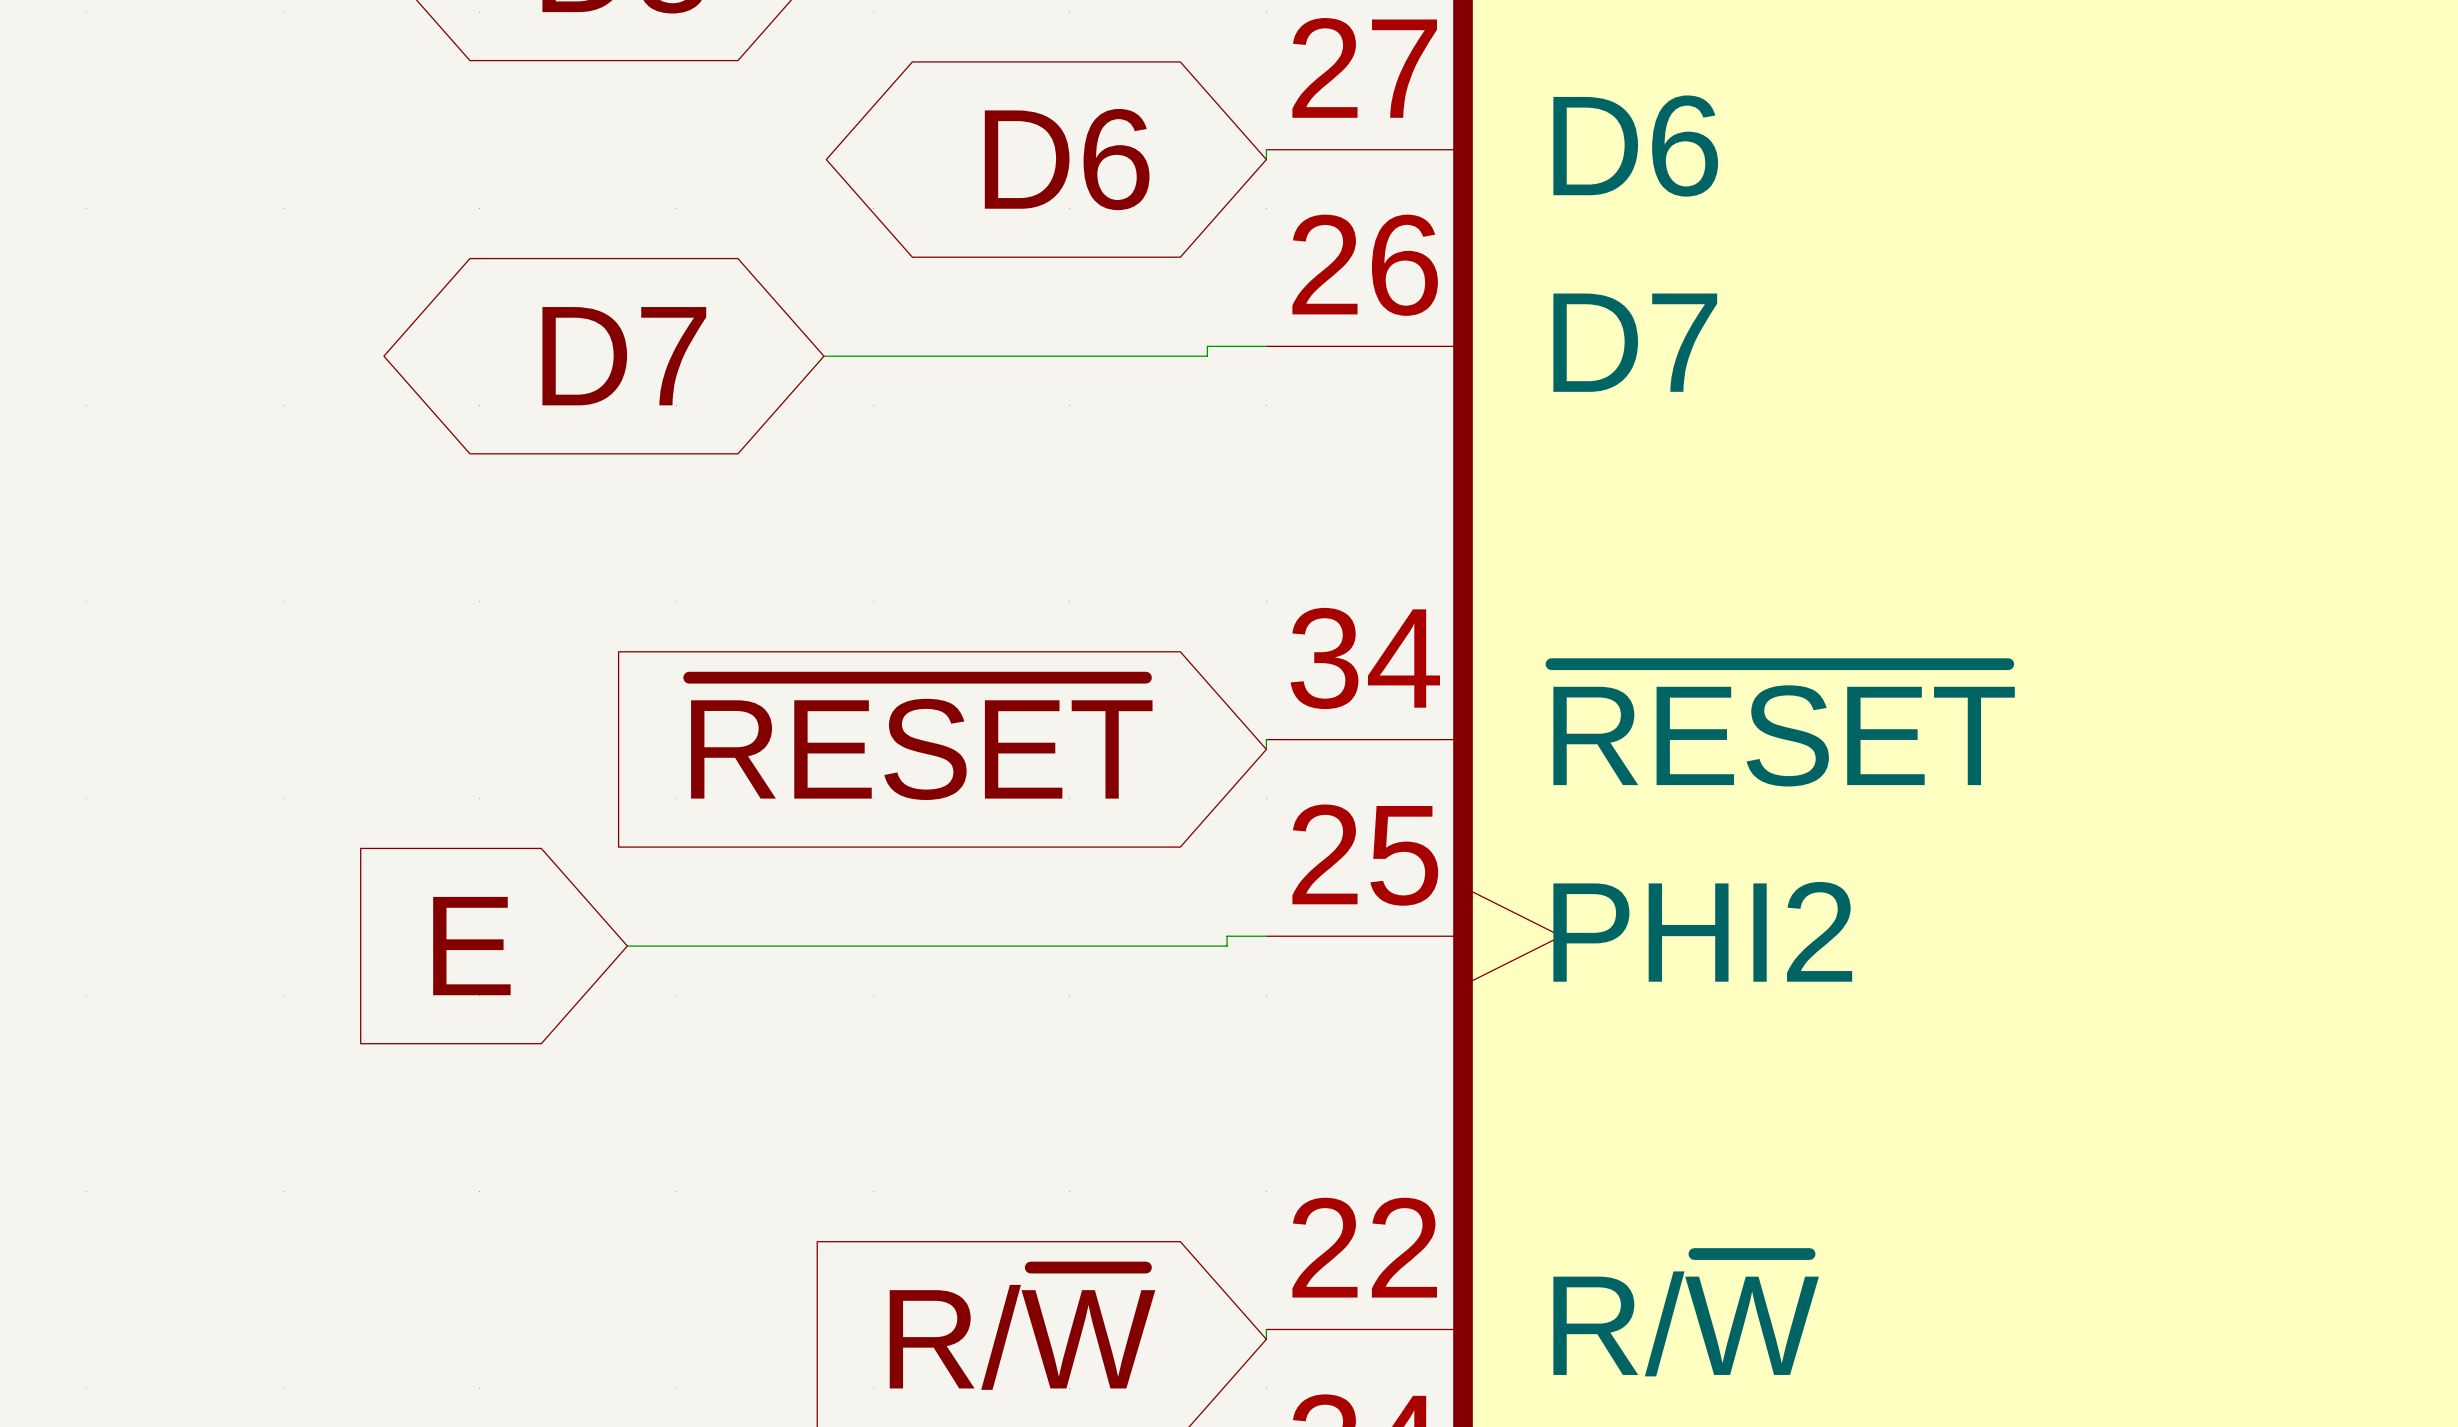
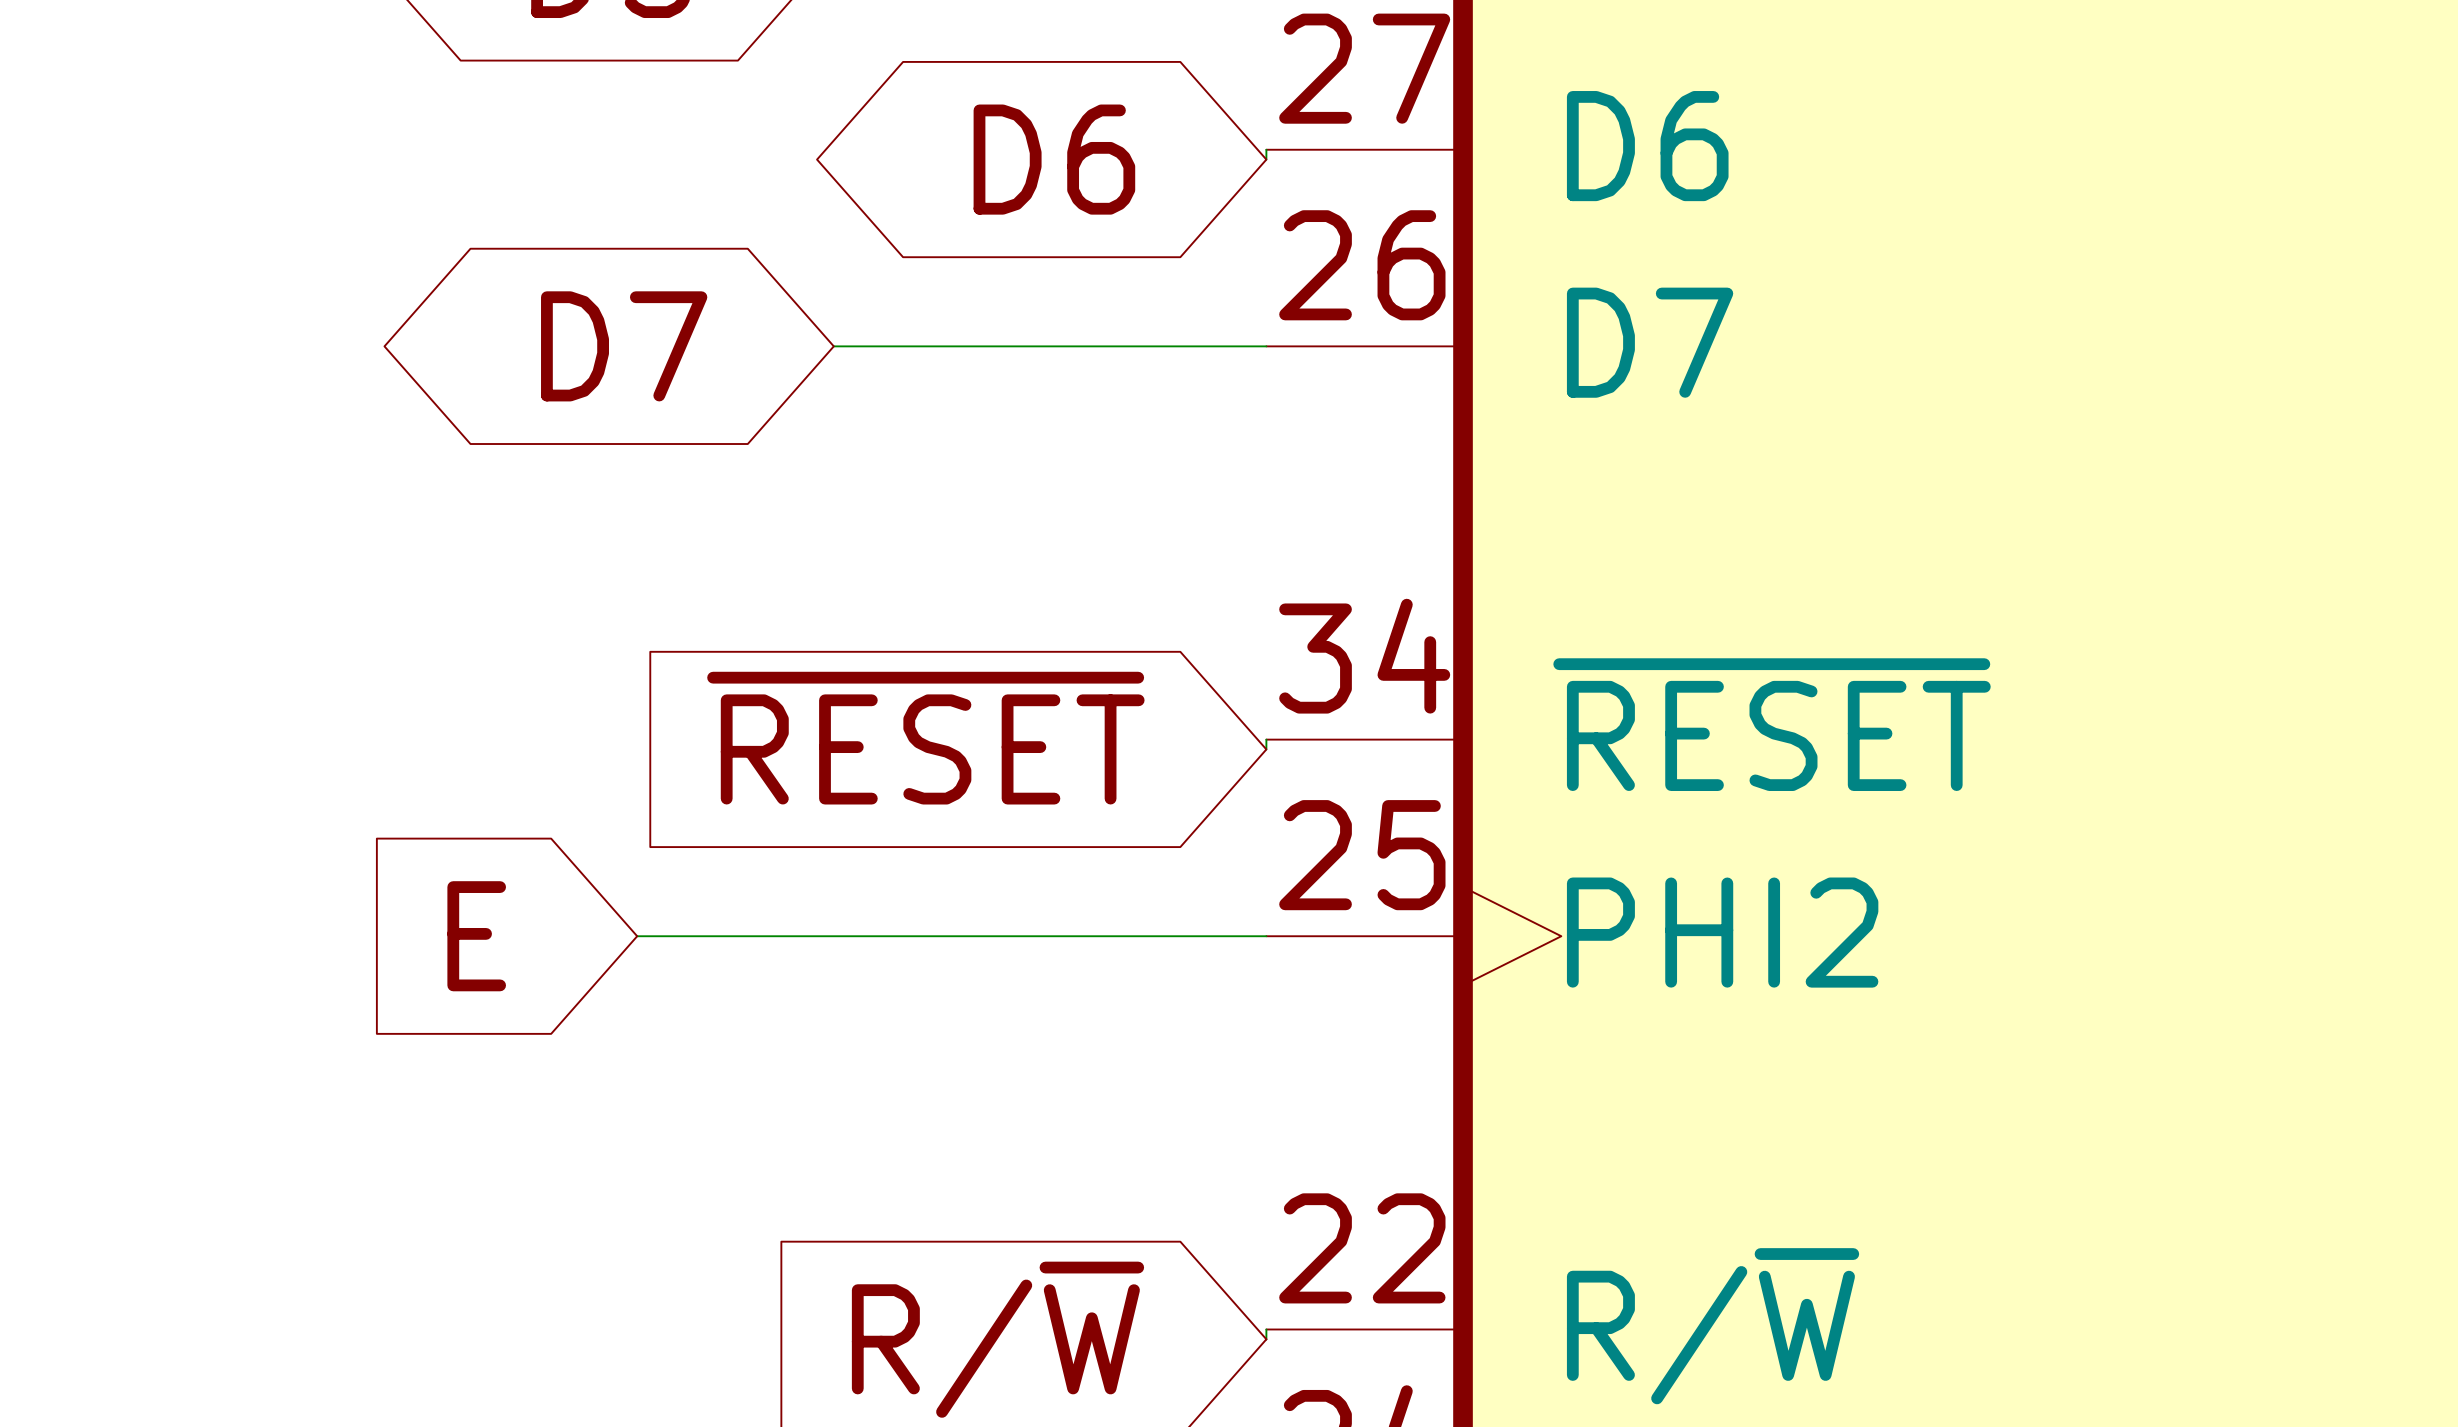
wire: (1207, 346) (1207, 356) (823, 356) -> (1207, 346) (833, 346)
global label position: D7 (624, 356) -> D7 (624, 346)
wire: (1227, 936) (1227, 946) (627, 946) -> (1227, 936) (637, 936)
global label position: E (471, 946) -> E (476, 936)

